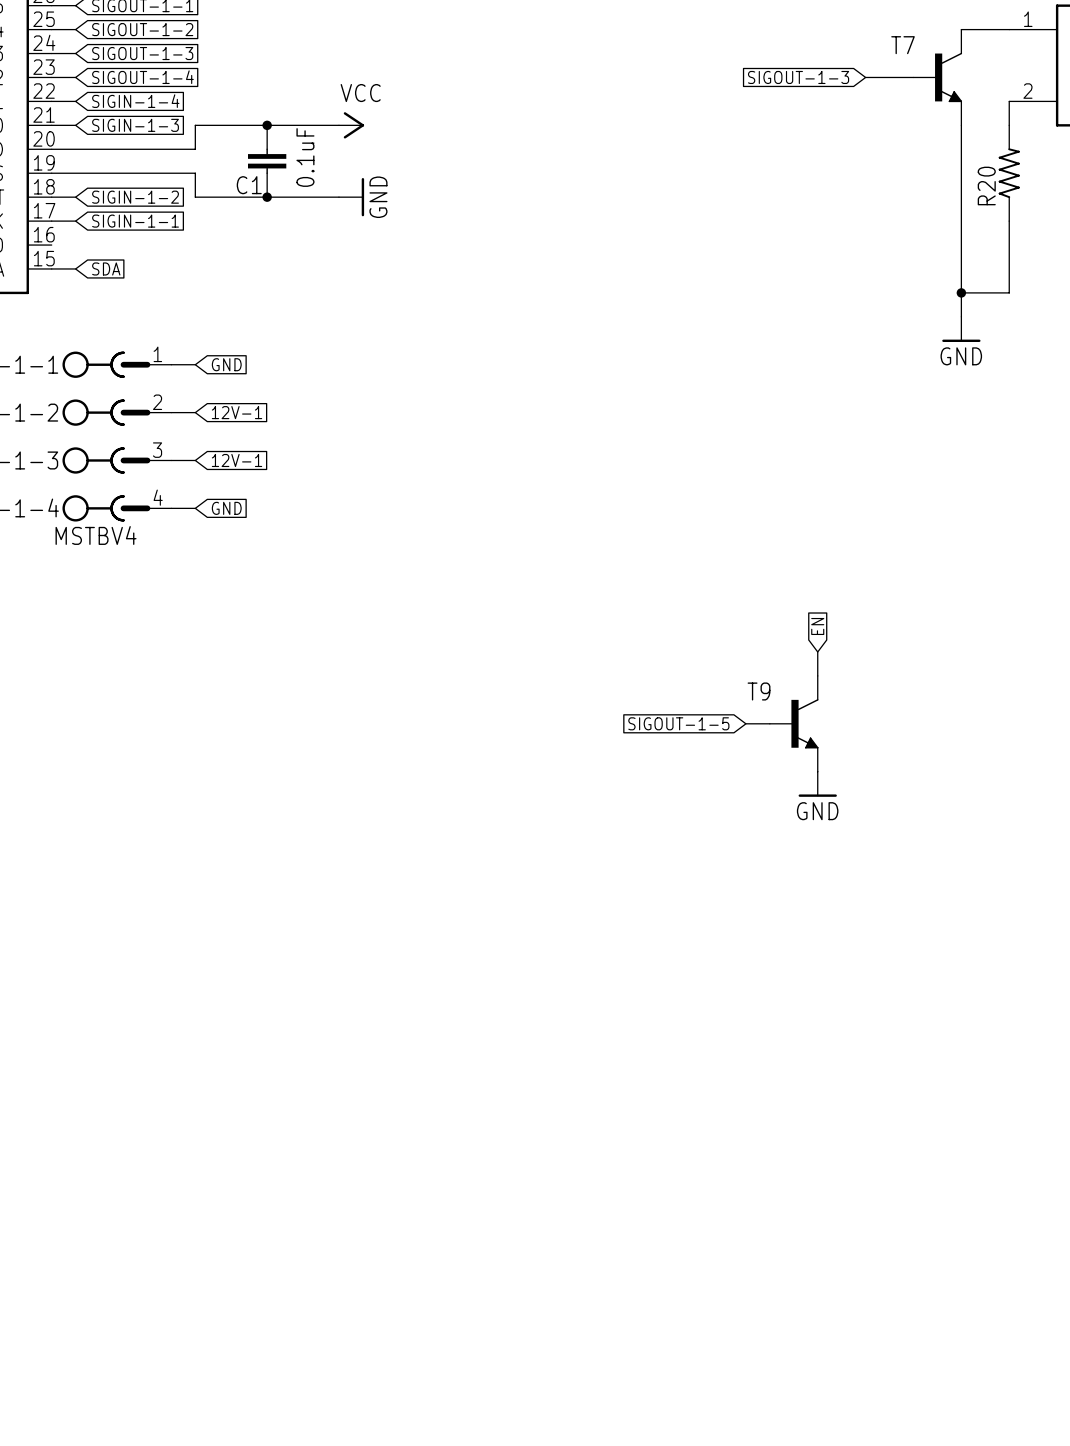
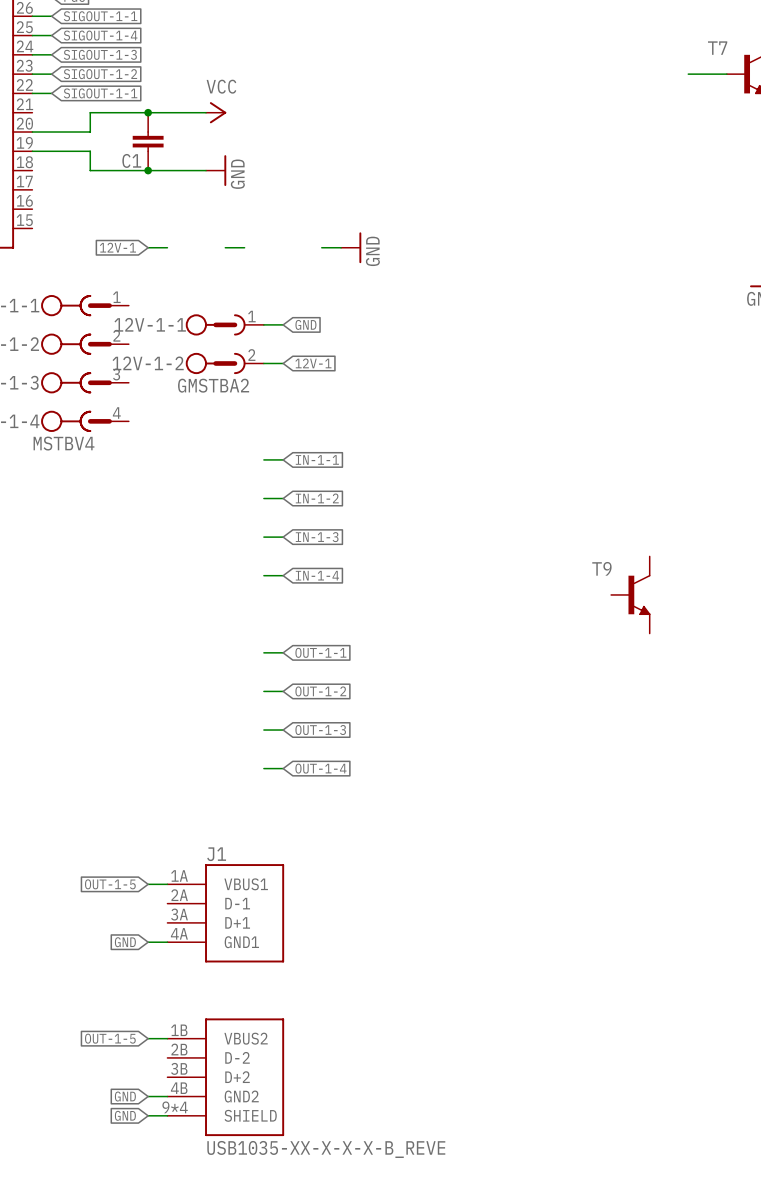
global label: SIGOUT-1-2 (142, 29) -> SIGOUT-1-4 (100, 35)
global label: SIGOUT-1-4 (142, 77) -> SIGOUT-1-2 (100, 74)
global label: SIGOUT-1-3 (798, 77) -> none
global label: SIGIN-1-4 (135, 101) -> SIGOUT-1-1 (100, 93)
wire: (51, 125) (75, 125) -> none
global label: SIGIN-1-3 (135, 125) -> none
wire: (195, 125) (195, 149) (123, 149) -> (148, 112) (90, 112) (90, 132)
junction: none -> (148, 112)
wire: (267, 125) (338, 125) -> none
junction: (267, 125) -> none
power symbol position: VCC (351, 125) -> VCC (216, 112)
C1 value: 0.1uF (305, 157) -> none
C1 position: (267, 161) -> (148, 141)
wire: (123, 173) (195, 173) (195, 197) -> (90, 151) (90, 170) (148, 170)
wire: (51, 197) (75, 197) -> none
global label: SIGIN-1-2 (135, 197) -> none
junction: none -> (148, 170)
wire: (267, 197) (338, 197) -> none
junction: (267, 197) -> none
power symbol: none -> GND (216, 170)
power symbol: GND (351, 197) -> none
wire: (51, 221) (75, 221) -> none
global label: SIGIN-1-1 (135, 221) -> none
wire: (51, 268) (75, 268) -> (148, 247) (167, 247)
global label: SDA (106, 268) -> none
global label: none -> 12V-1 (117, 247)
wire: none -> (321, 247) (341, 247)
power symbol: none -> GND (351, 247)
wire: (171, 364) (195, 364) -> (225, 247) (244, 247)
global label: GND (226, 364) -> none
12V-1-1: none -> (224, 324)
wire: none -> (263, 324) (283, 324)
global label: none -> GND (305, 324)
wire: (171, 412) (195, 412) -> (263, 459) (283, 459)
global label: 12V-1 (237, 412) -> none
12V-1-2: none -> GMSTBA2 (224, 363)
wire: none -> (263, 363) (283, 363)
global label: none -> 12V-1 (313, 363)
wire: (171, 460) (195, 460) -> (263, 498) (283, 498)
global label: 12V-1 (237, 460) -> none
wire: (171, 508) (195, 508) -> (263, 537) (283, 537)
global label: GND (226, 508) -> none
global label: none -> IN-1-1 (317, 459)
global label: none -> IN-1-2 (317, 498)
global label: EN (817, 626) -> none
global label: none -> IN-1-3 (317, 537)
wire: (817, 651) (817, 675) -> none
wire: none -> (263, 575) (283, 575)
global label: none -> IN-1-4 (317, 575)
global label: SIGOUT-1-5 (678, 723) -> none
wire: (745, 723) (769, 723) -> none
power symbol: GND (817, 784) -> none
wire: none -> (263, 652) (283, 652)
global label: none -> OUT-1-1 (320, 652)
wire: none -> (263, 691) (283, 691)
global label: none -> OUT-1-2 (320, 691)
wire: none -> (263, 730) (283, 730)
global label: none -> OUT-1-3 (320, 730)
global label: none -> OUT-1-4 (320, 768)
wire: none -> (263, 768) (283, 768)
global label: none -> OUT-1-5 (110, 884)
wire: none -> (148, 884) (167, 884)
global label: none -> GND (125, 942)
wire: none -> (148, 942) (167, 942)
J1: none -> USB1035-XX-X-X-X-B_REVE (225, 1000)
global label: none -> OUT-1-5 (110, 1038)
wire: none -> (148, 1038) (167, 1038)
global label: none -> GND (125, 1096)
wire: none -> (148, 1096) (167, 1096)
global label: none -> GND (125, 1115)
wire: none -> (148, 1115) (167, 1115)

